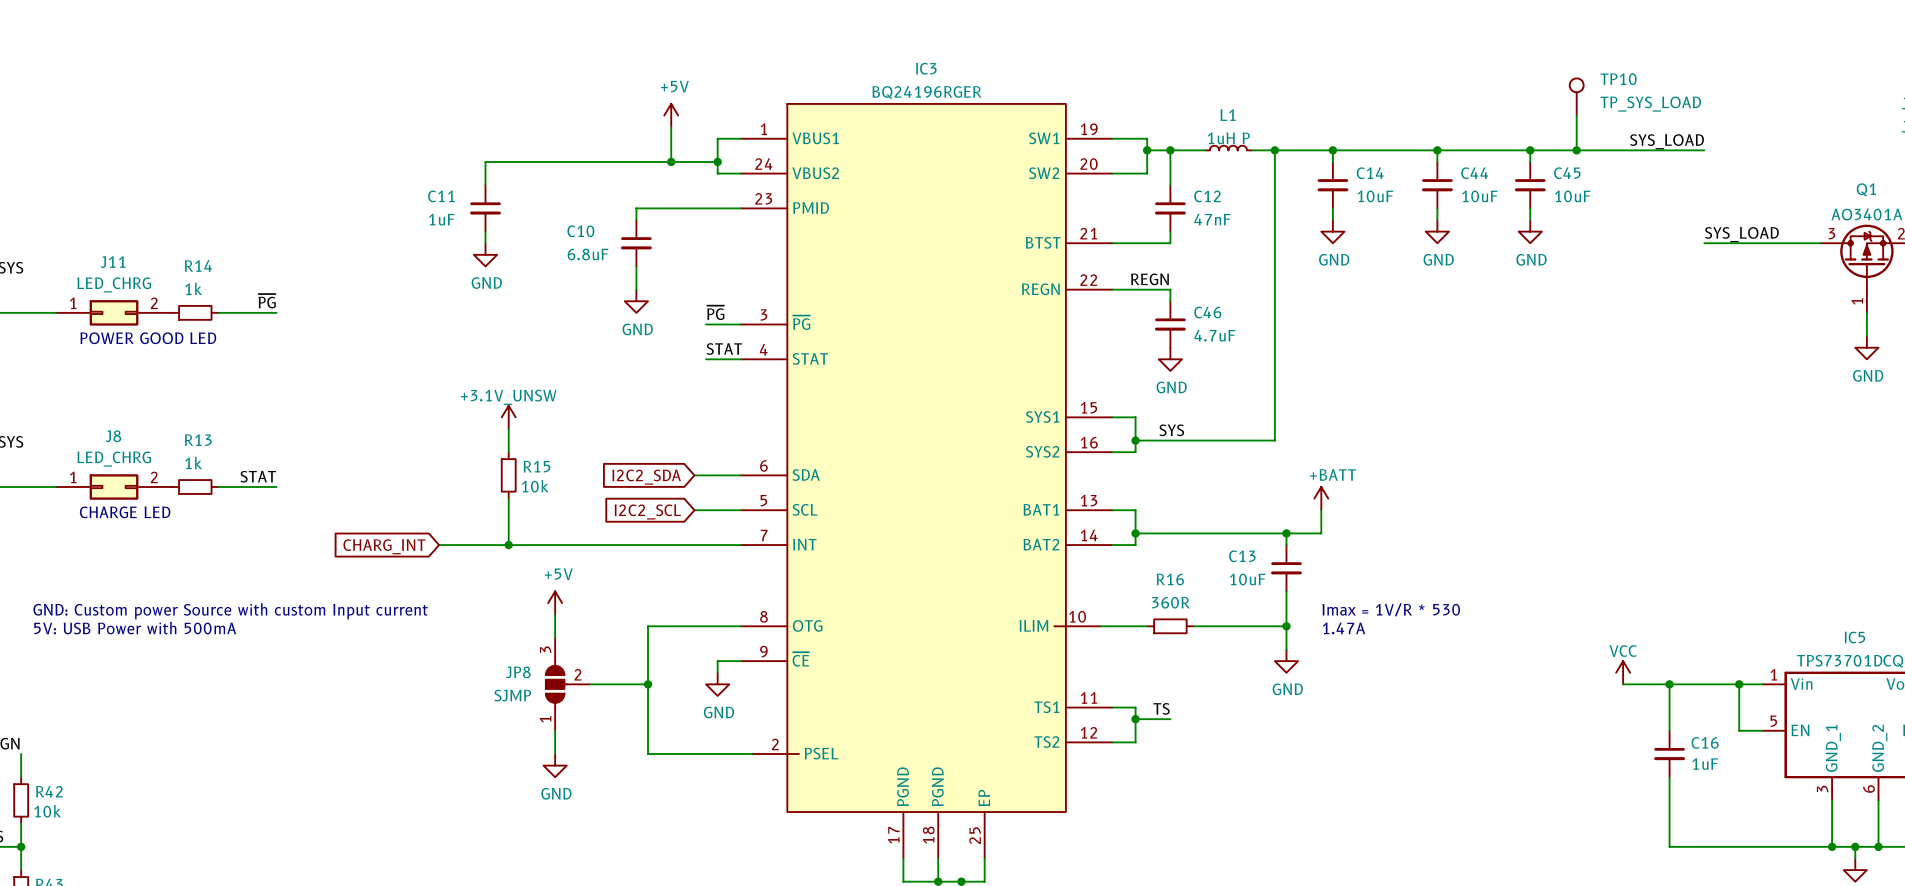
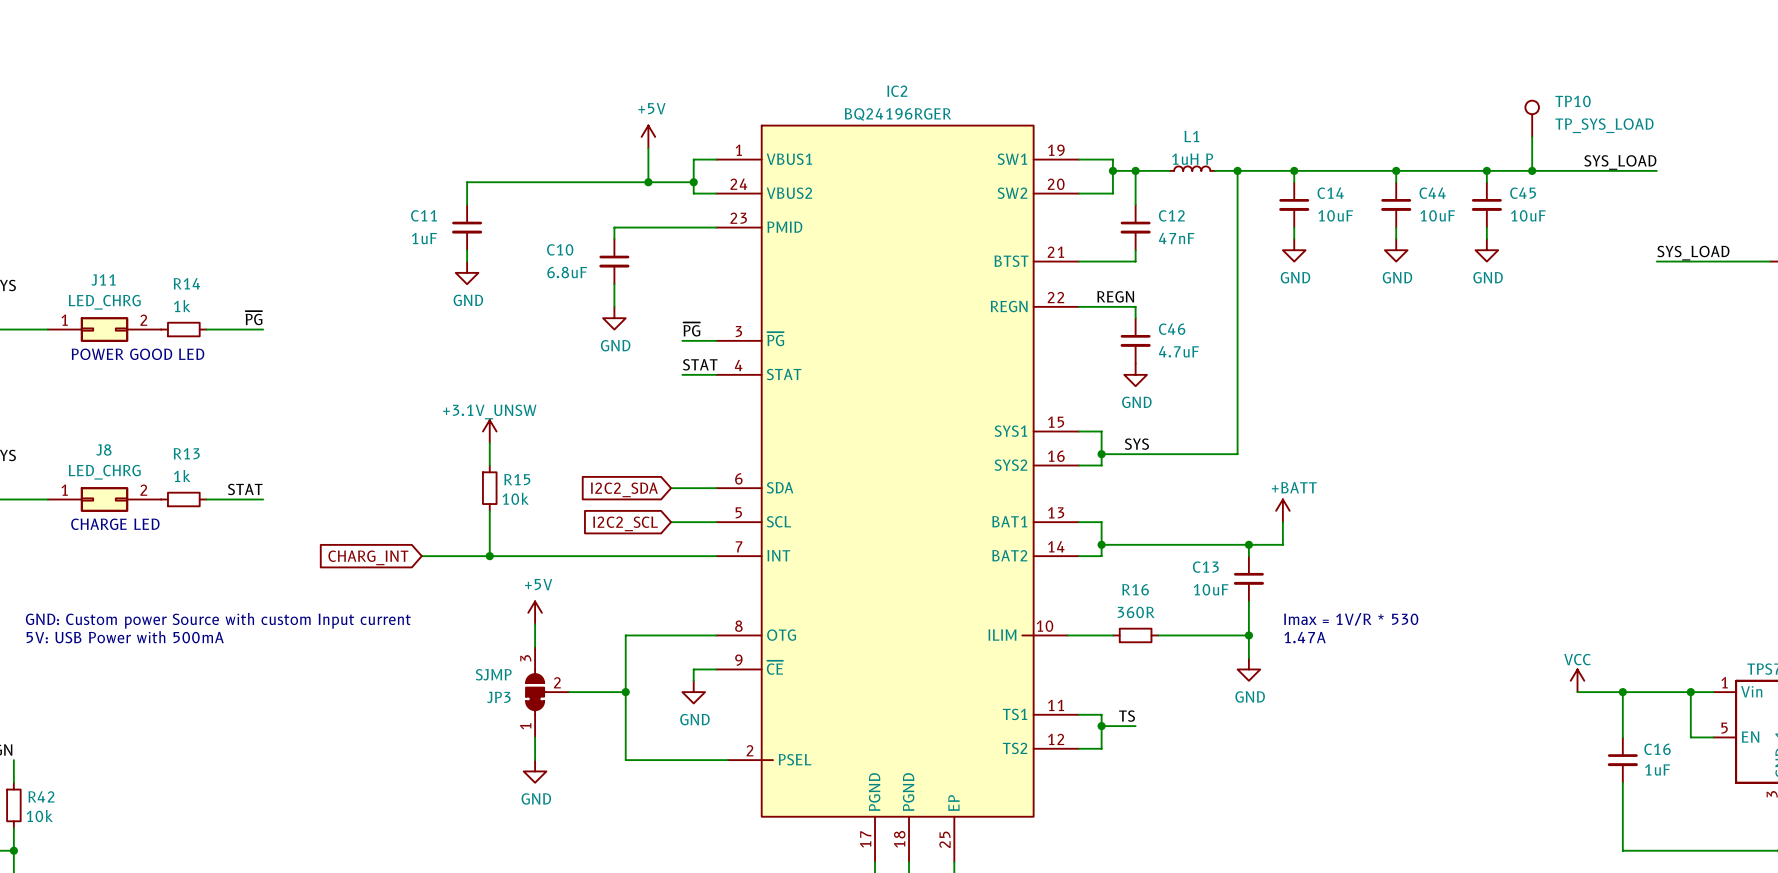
IC3 name: IC3 (926, 68) -> IC2 (897, 91)
JP8: SJMP (567, 684) -> none
JP3: none -> SJMP (547, 692)

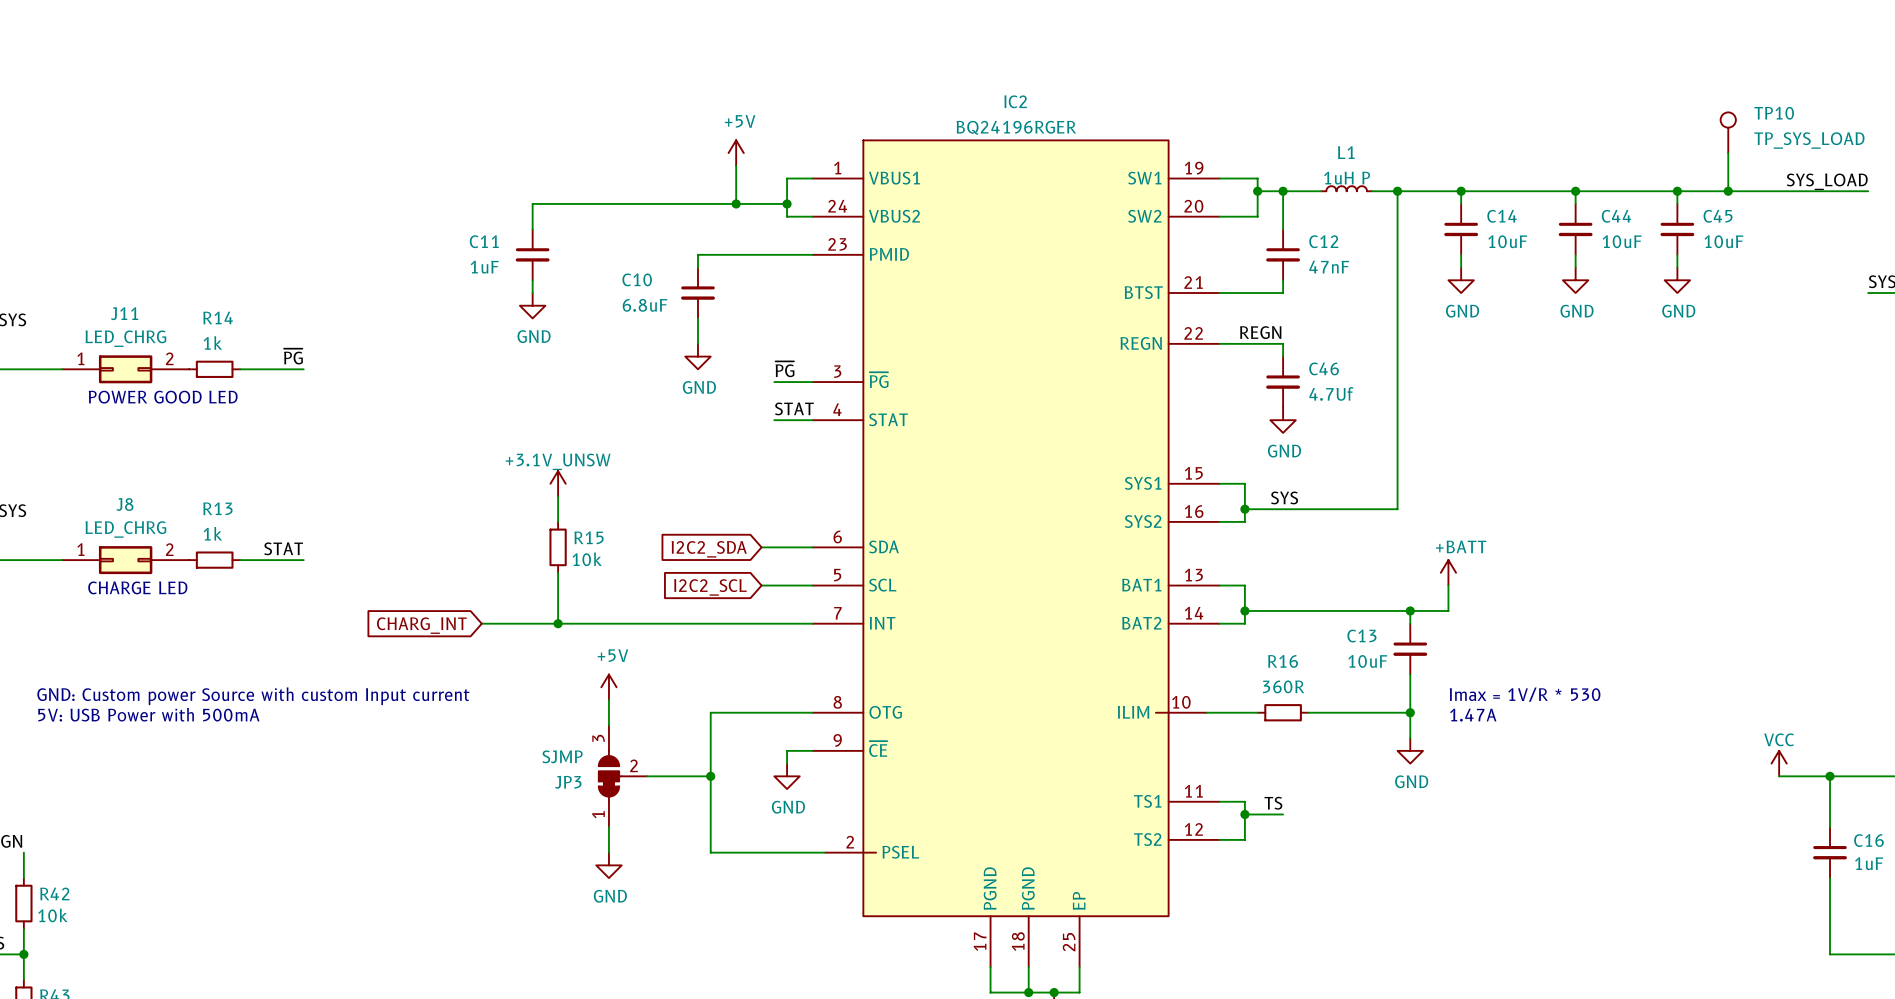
C46 value: 4.7uF (1178, 351) -> 4.7Uf (1331, 393)

